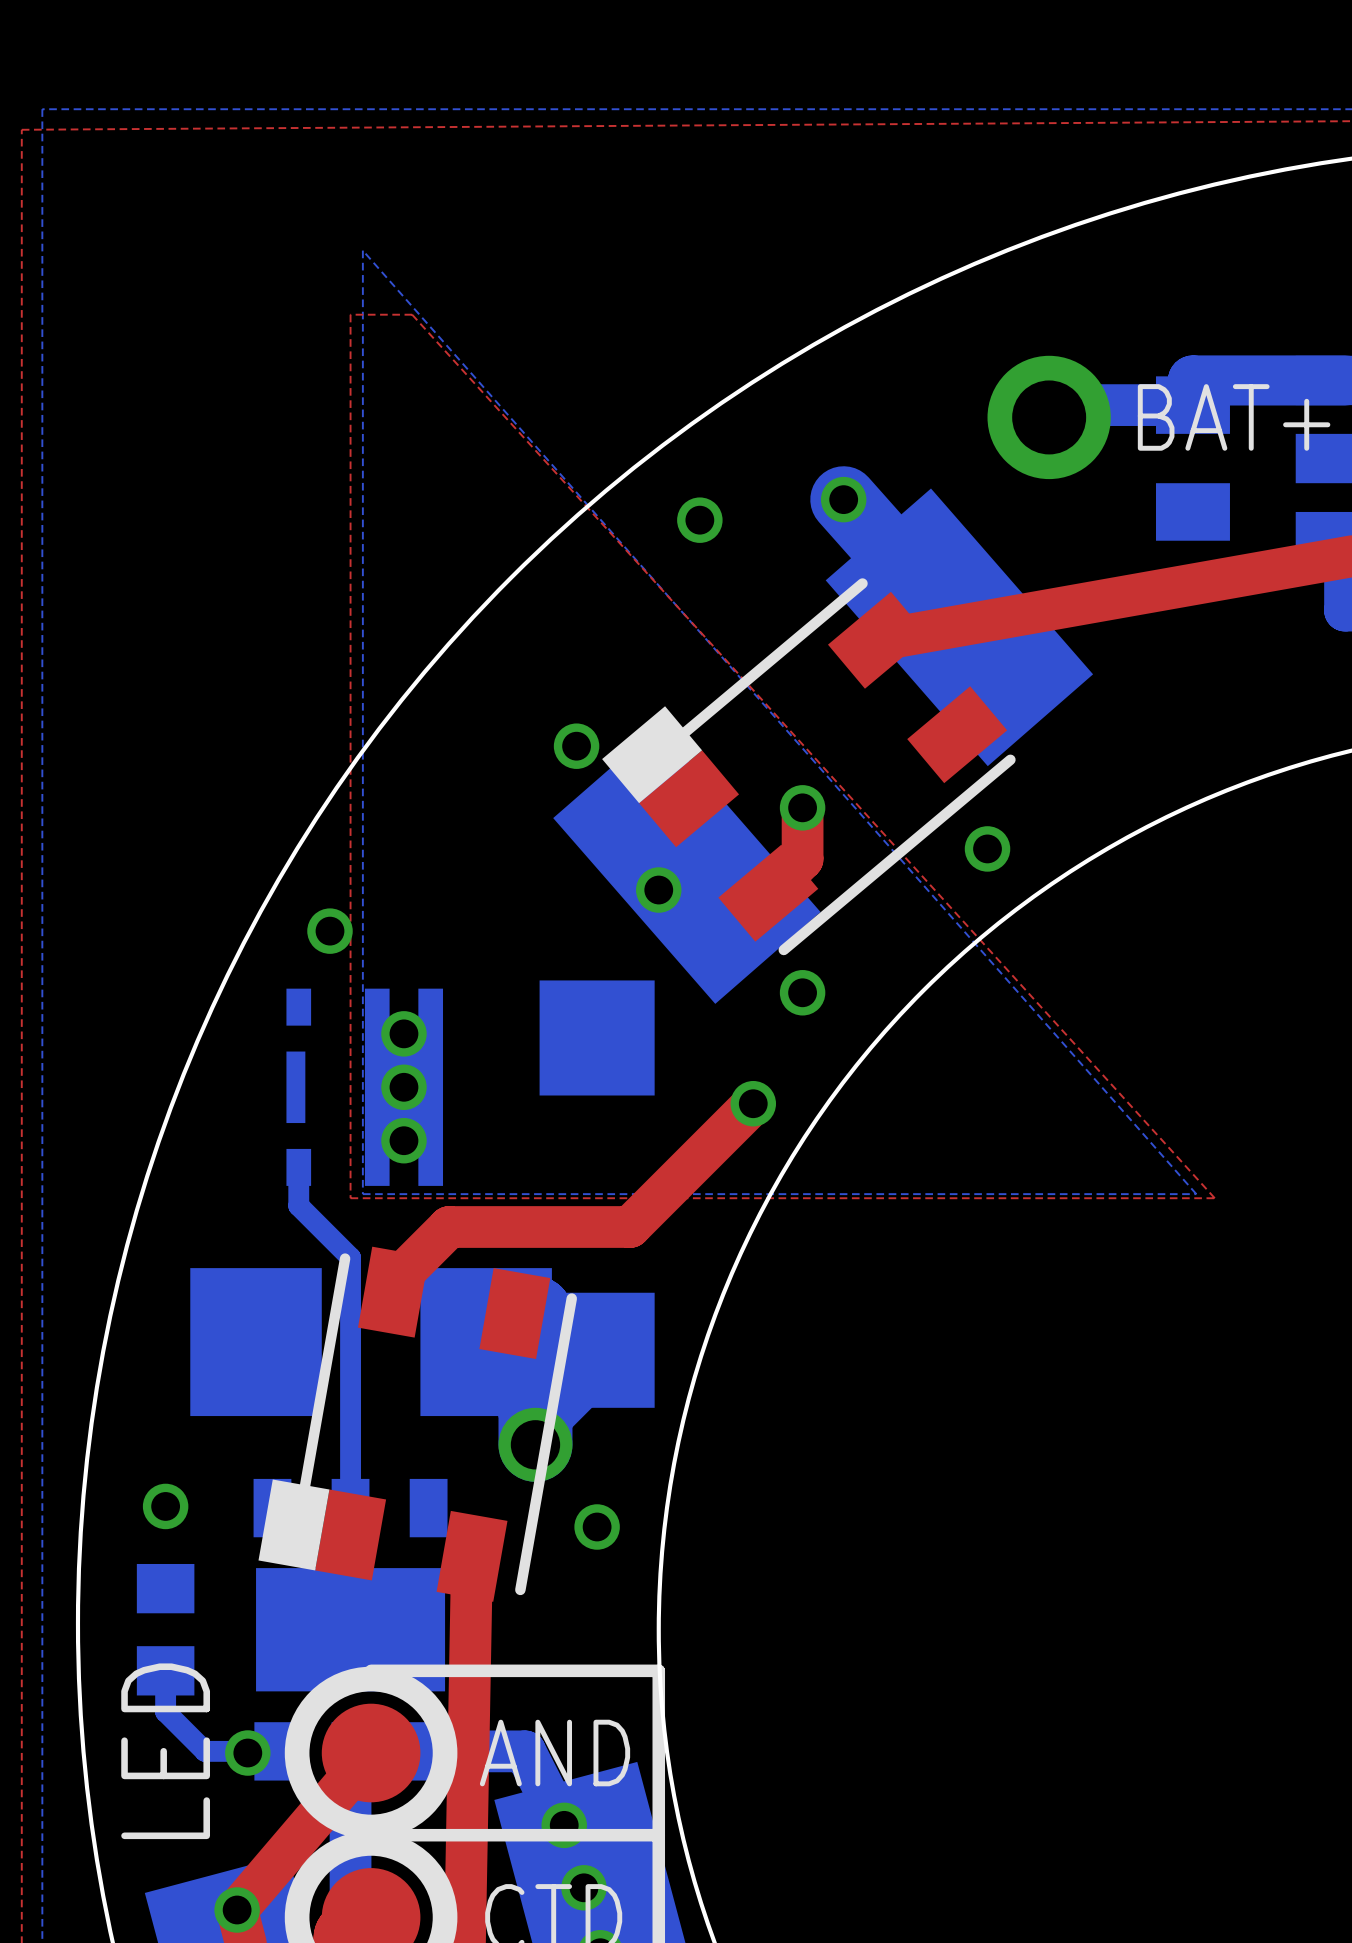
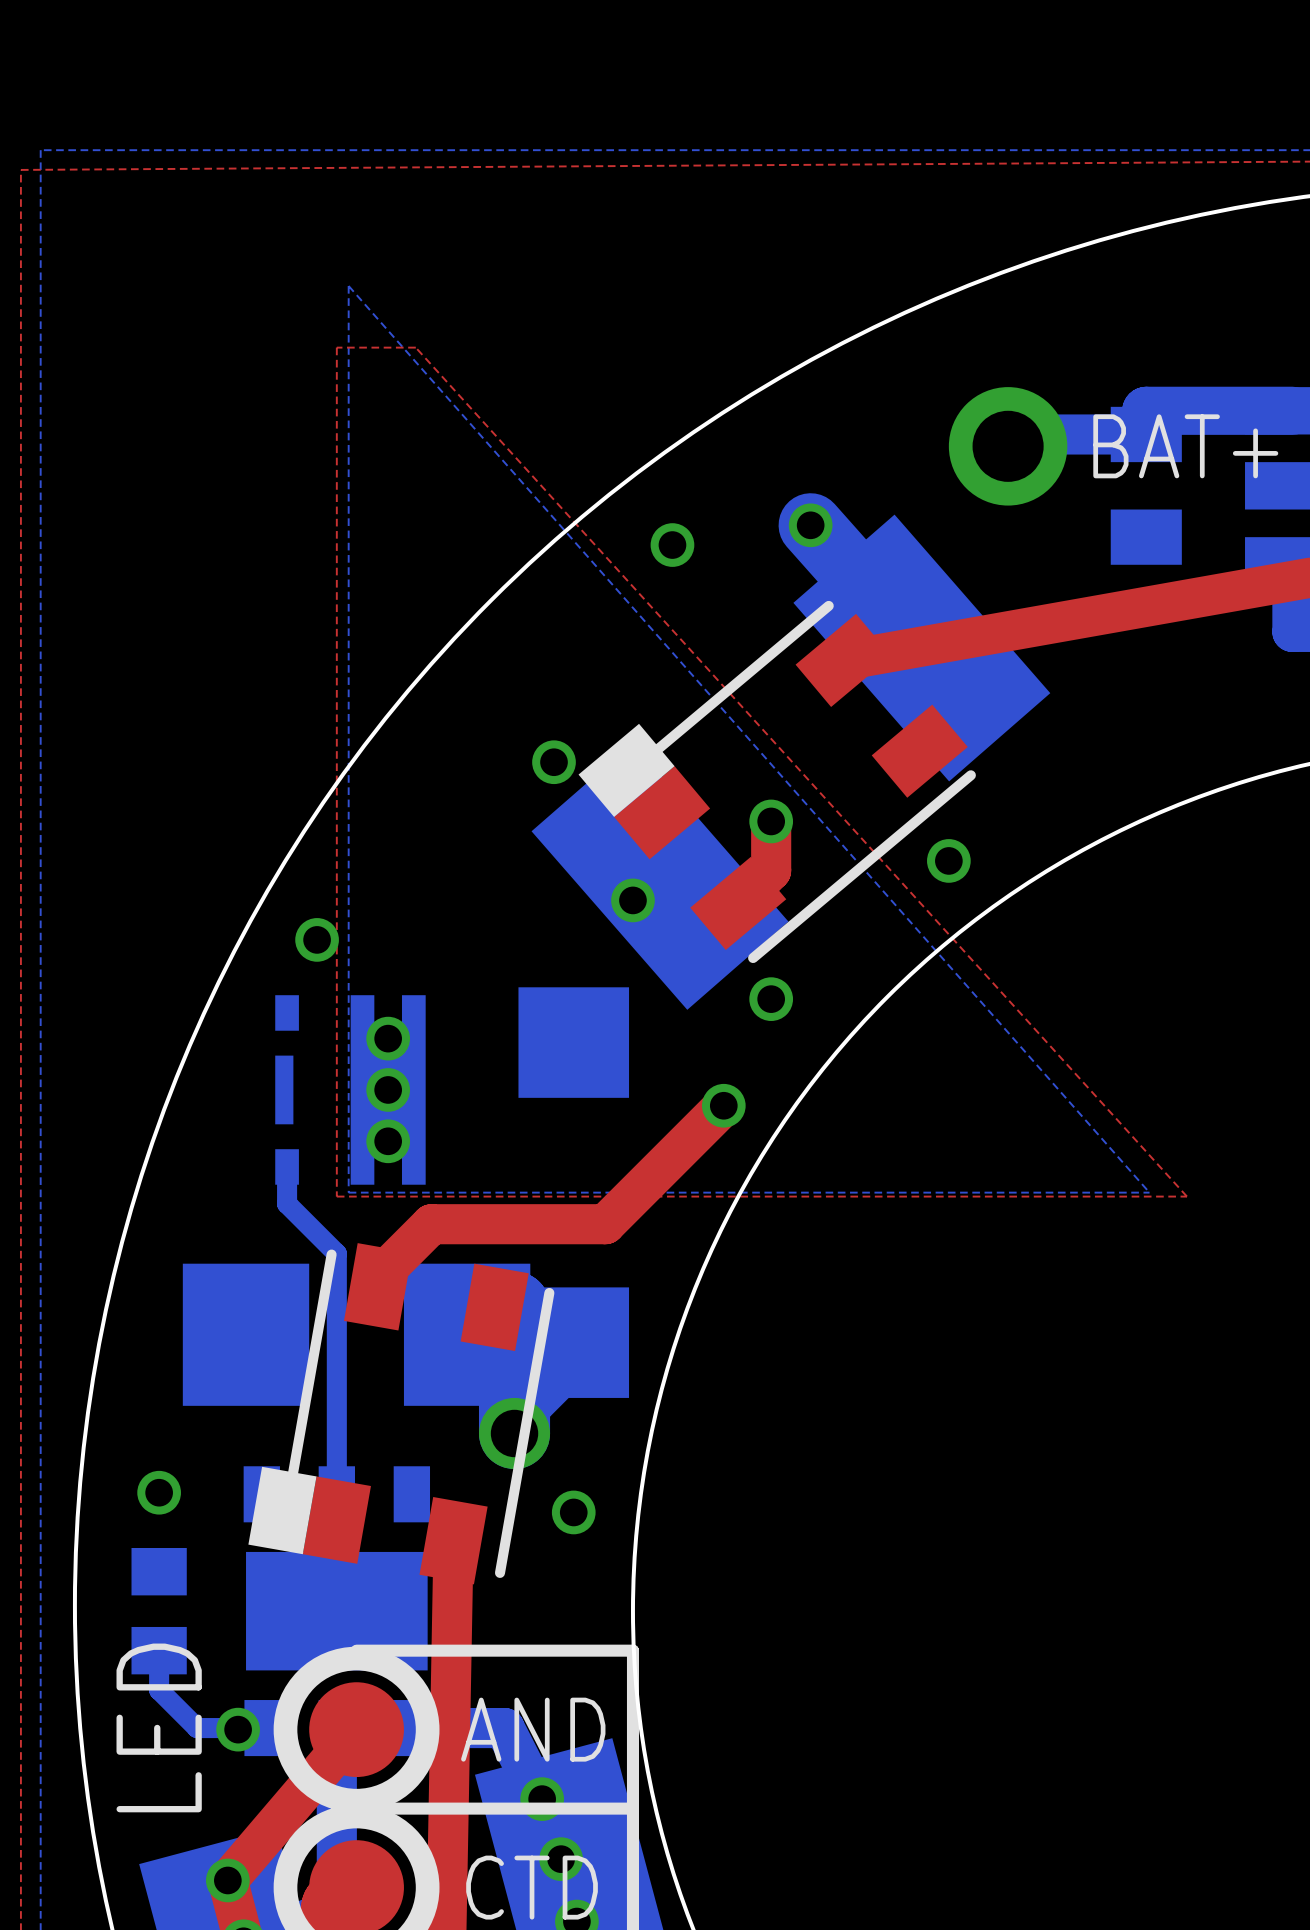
top zone outline: (412, 314) (1214, 1198) -> (396, 347) (415, 347) (1186, 1196) (1167, 1196)

